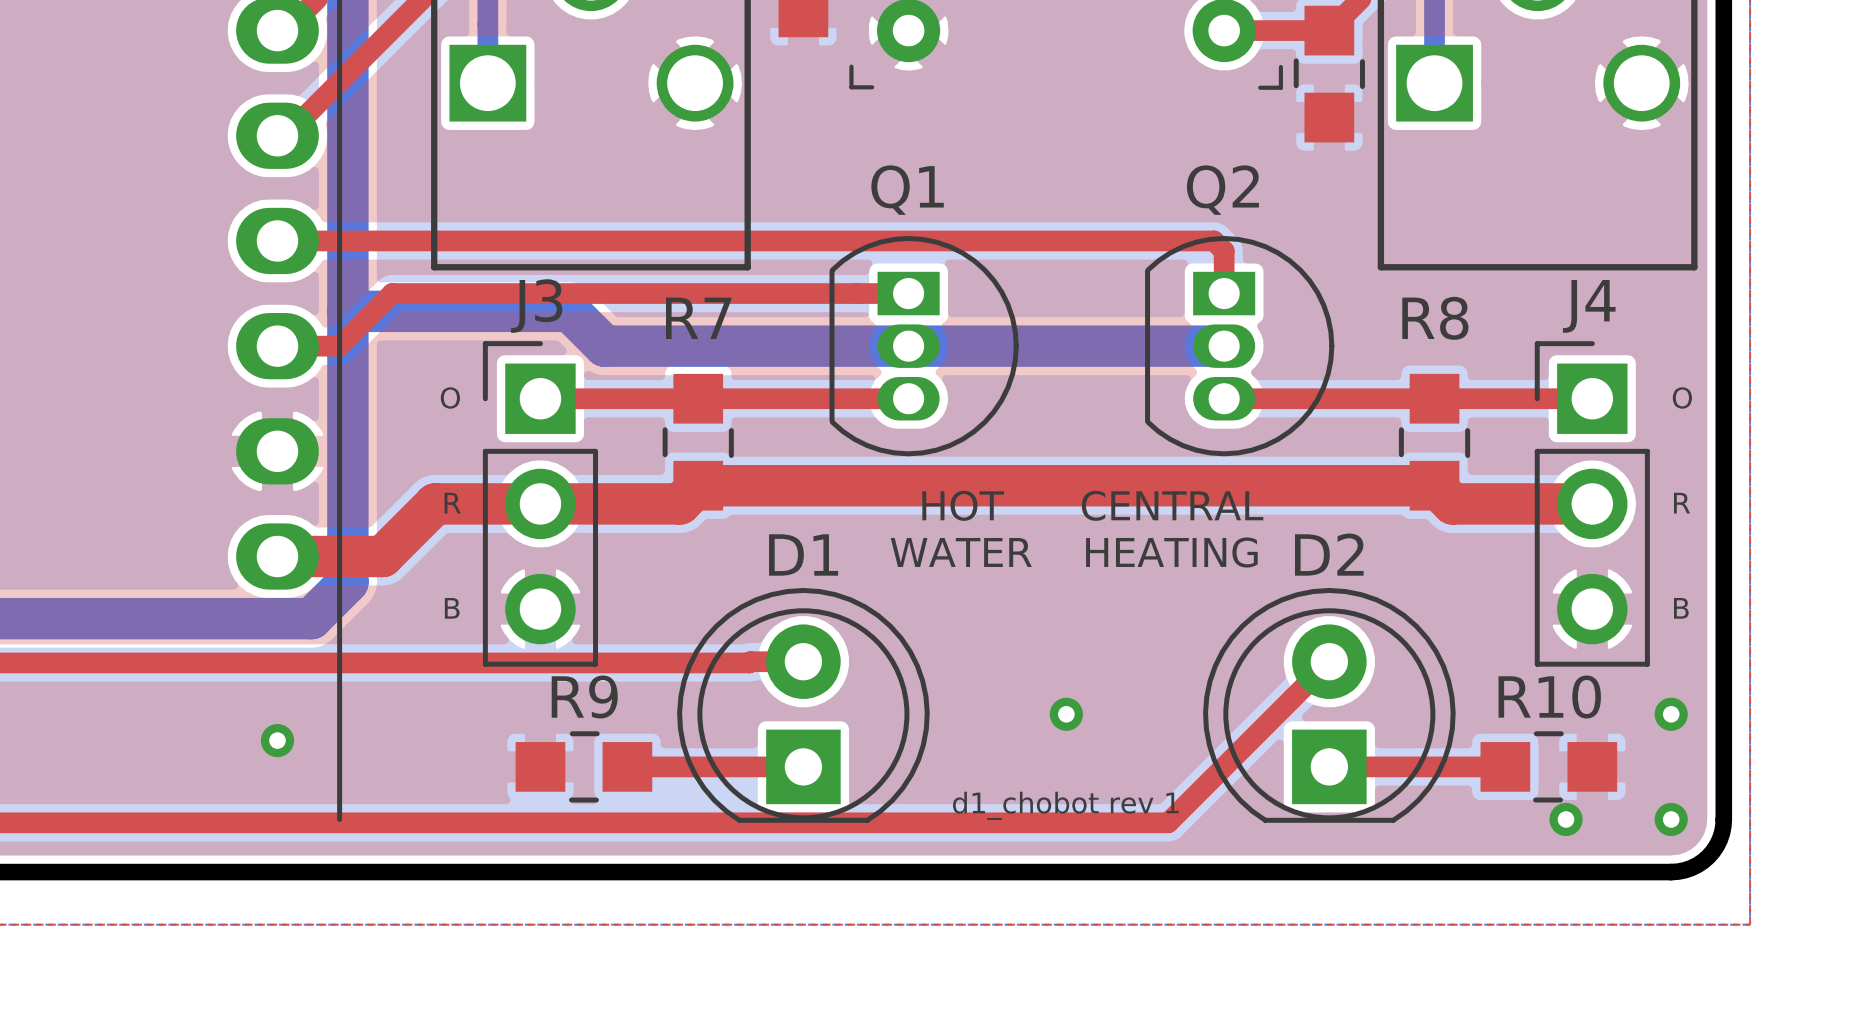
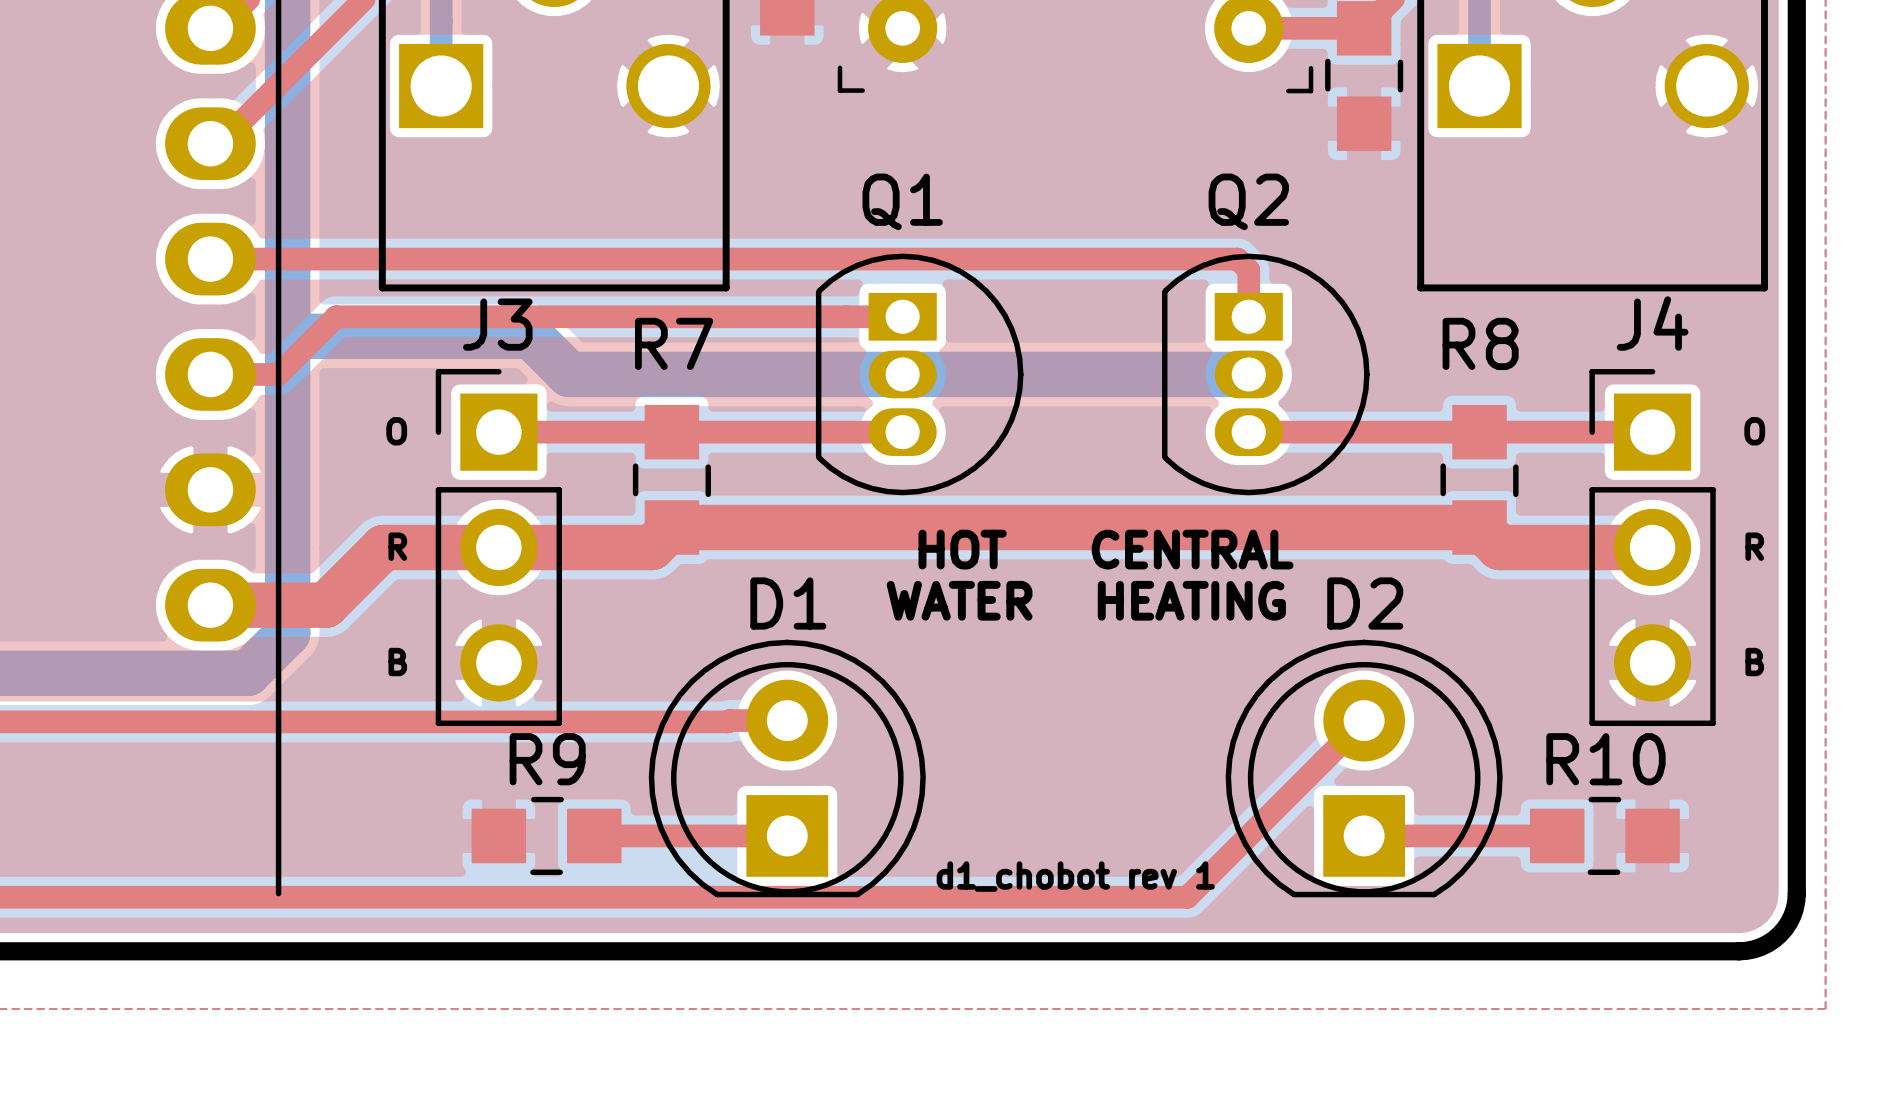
via: (1066, 714) -> none
via: (1671, 714) -> none
via: (277, 740) -> none
via: (1566, 819) -> none
via: (1671, 819) -> none

